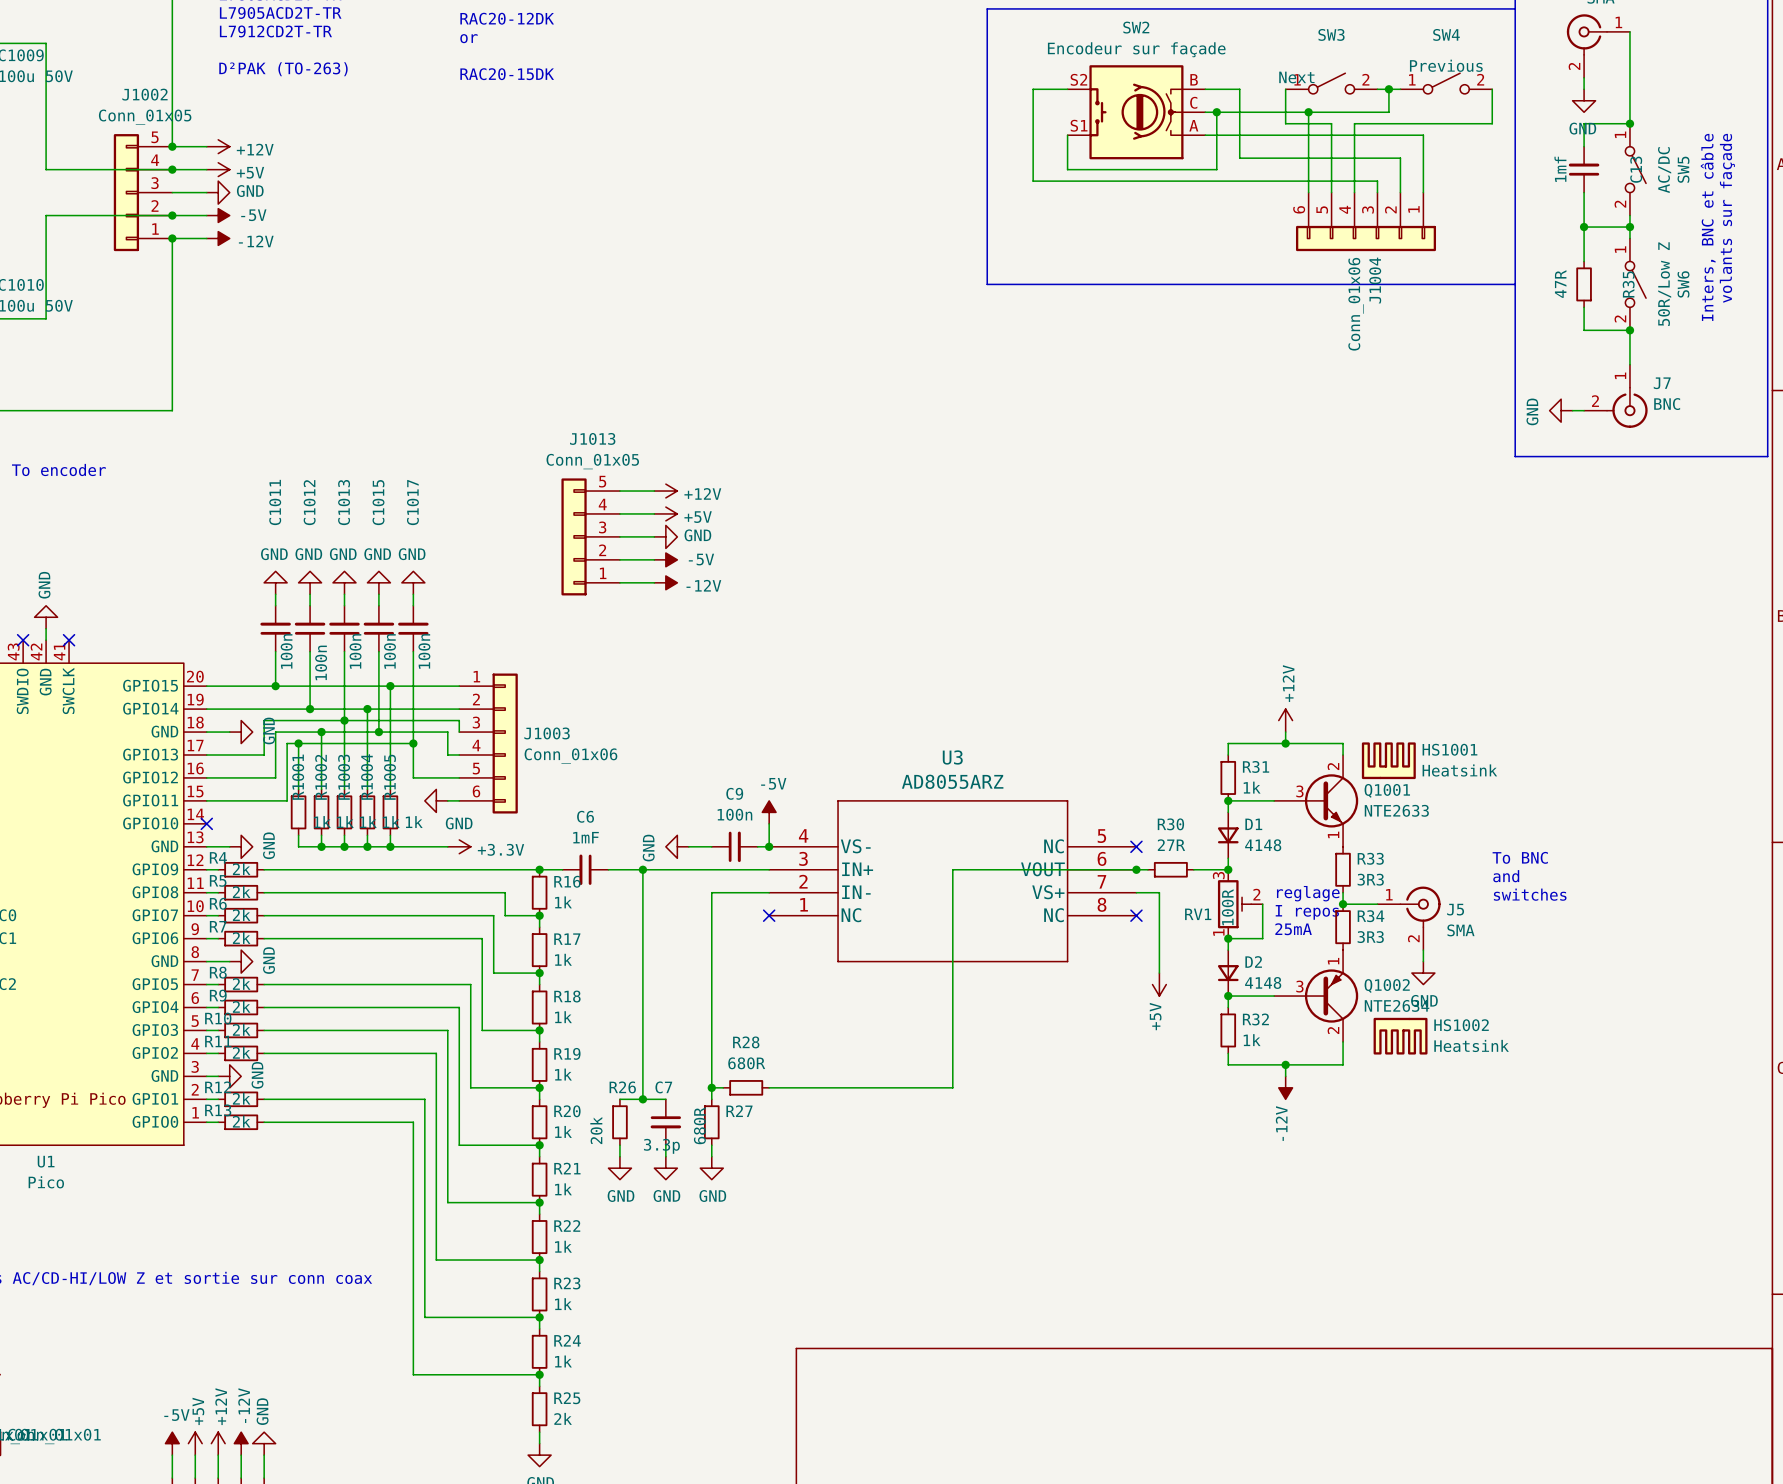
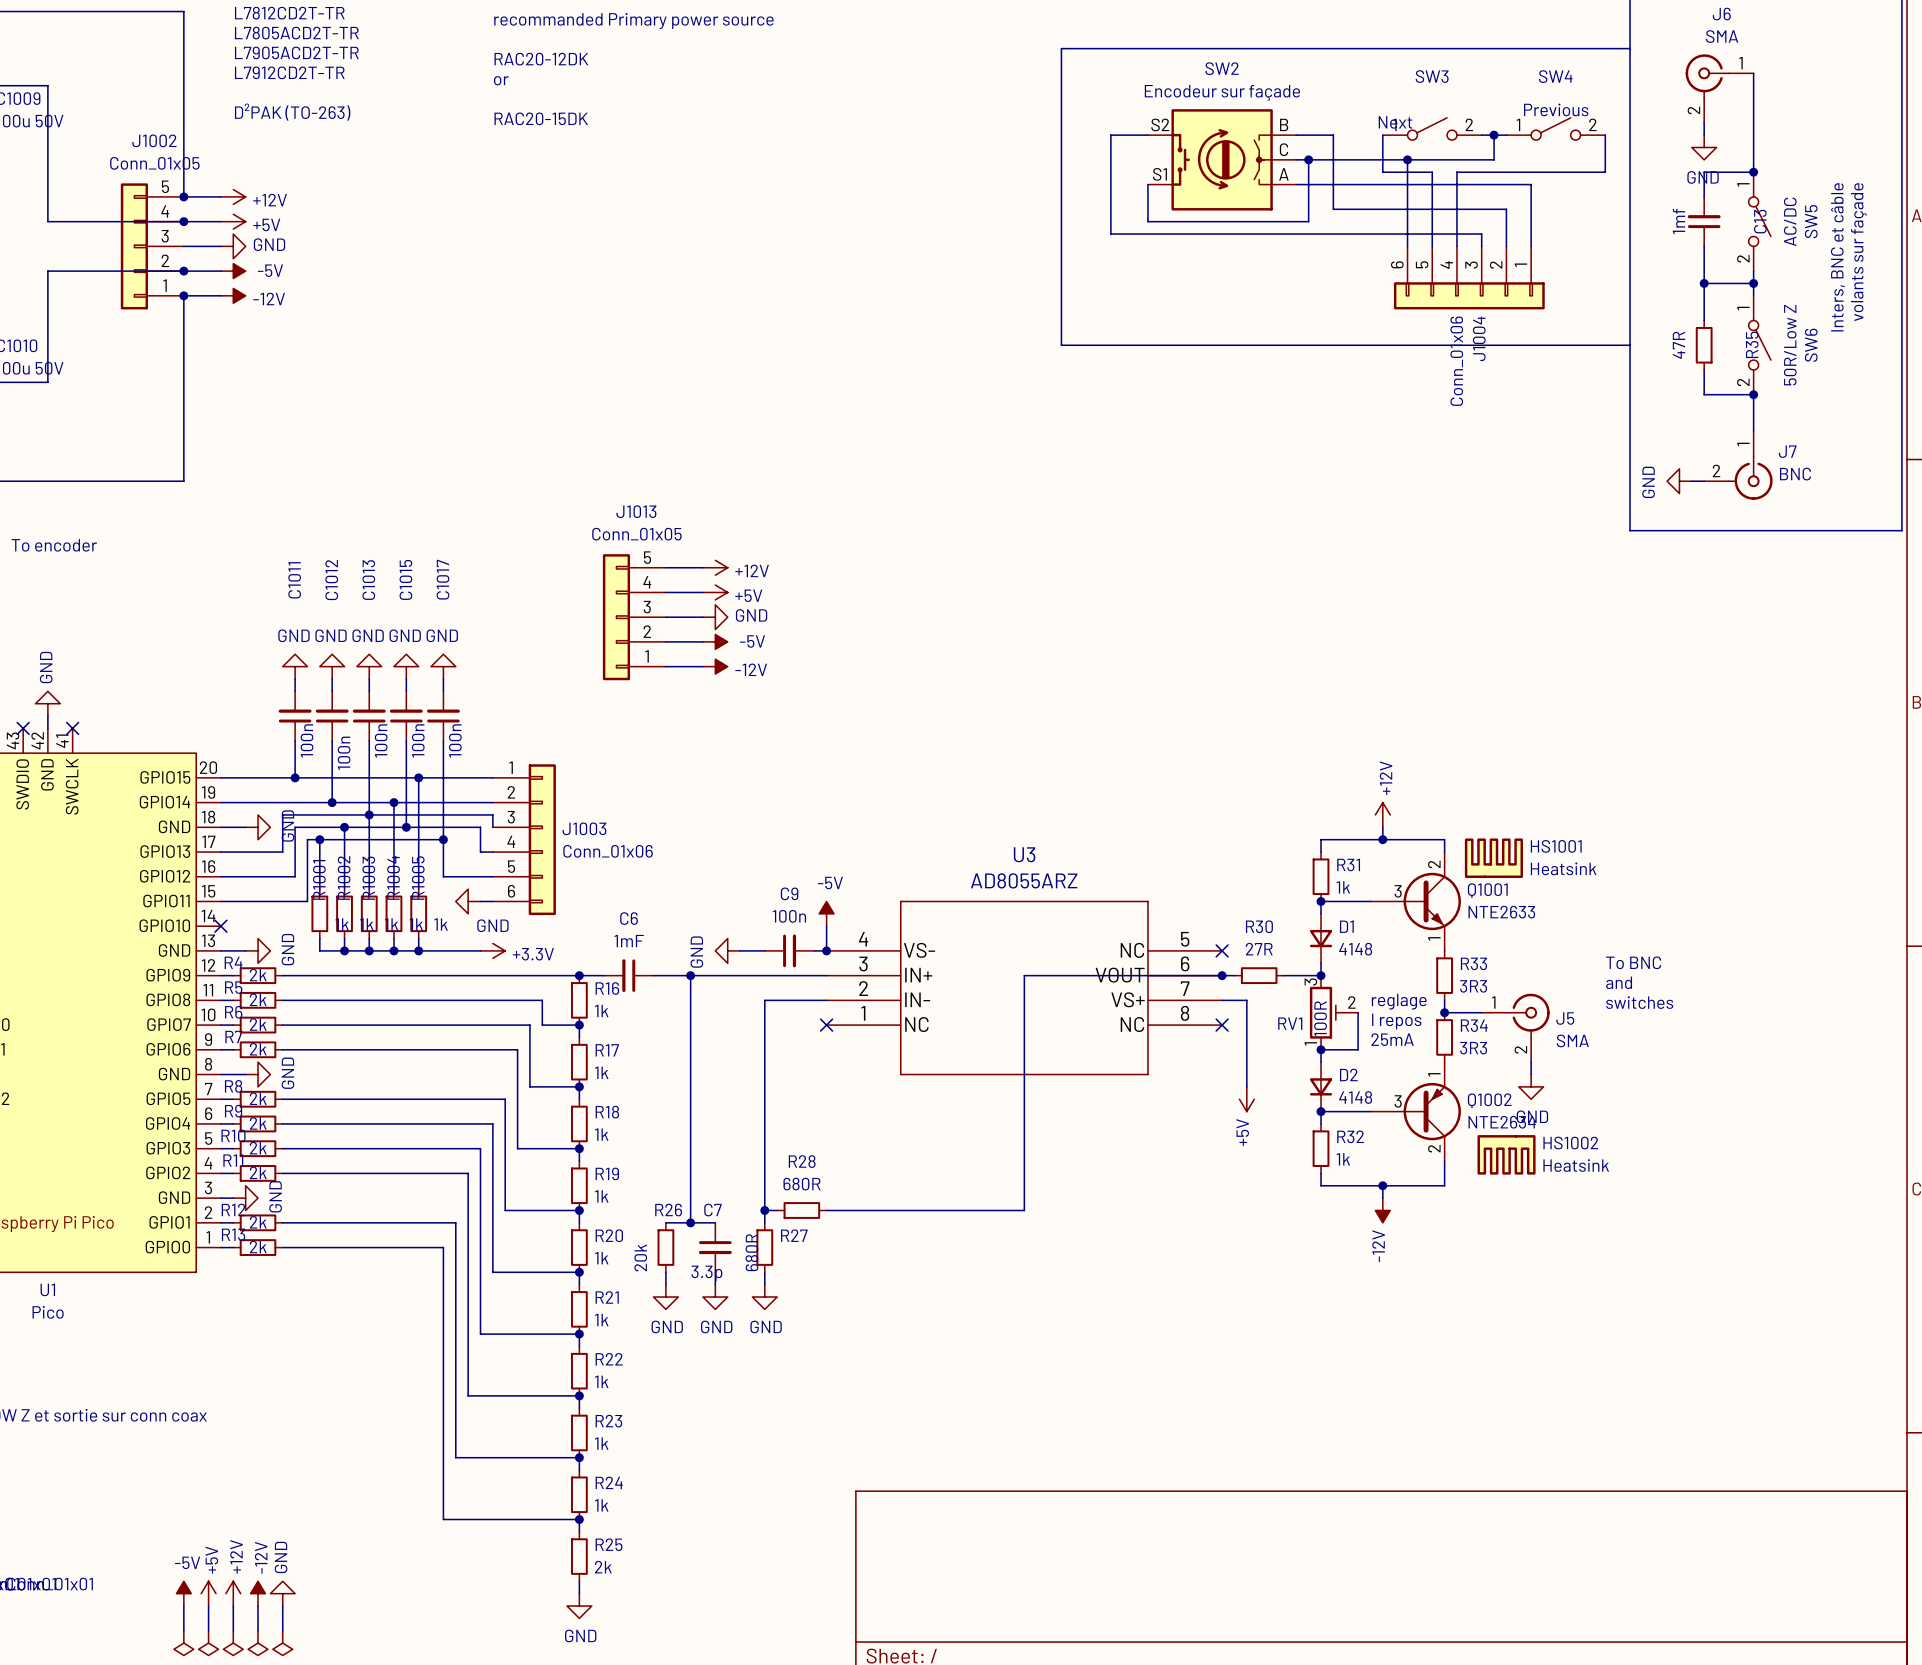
SW2 symbol: [1067, 65, 1206, 160] -> [1147, 109, 1297, 211]

